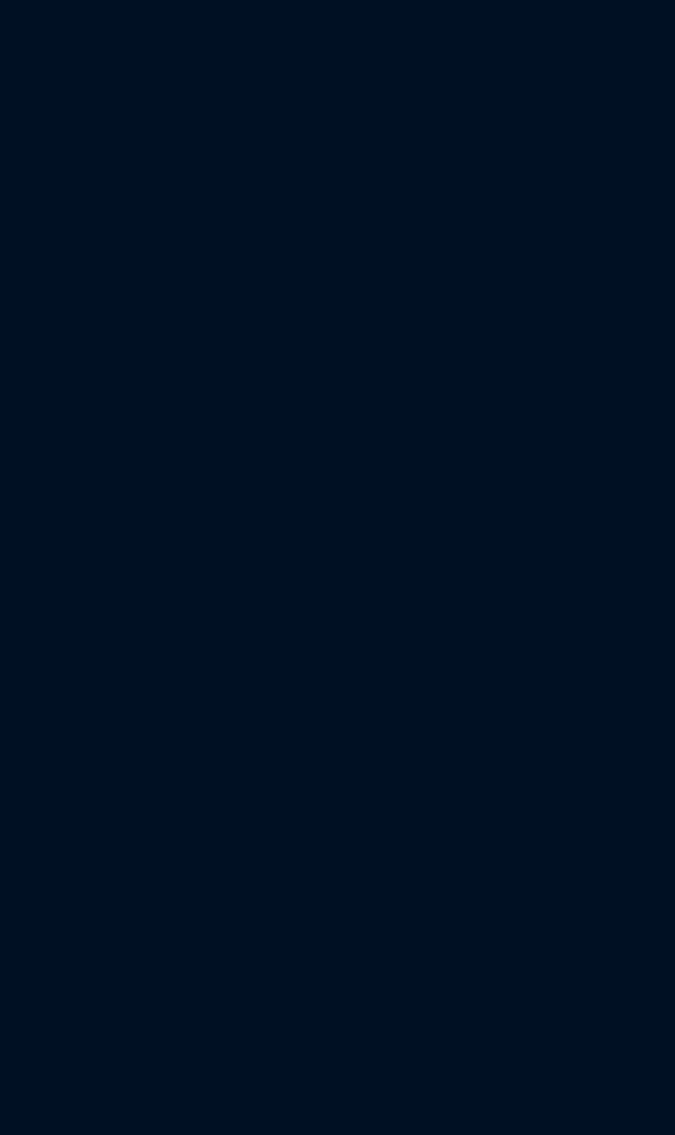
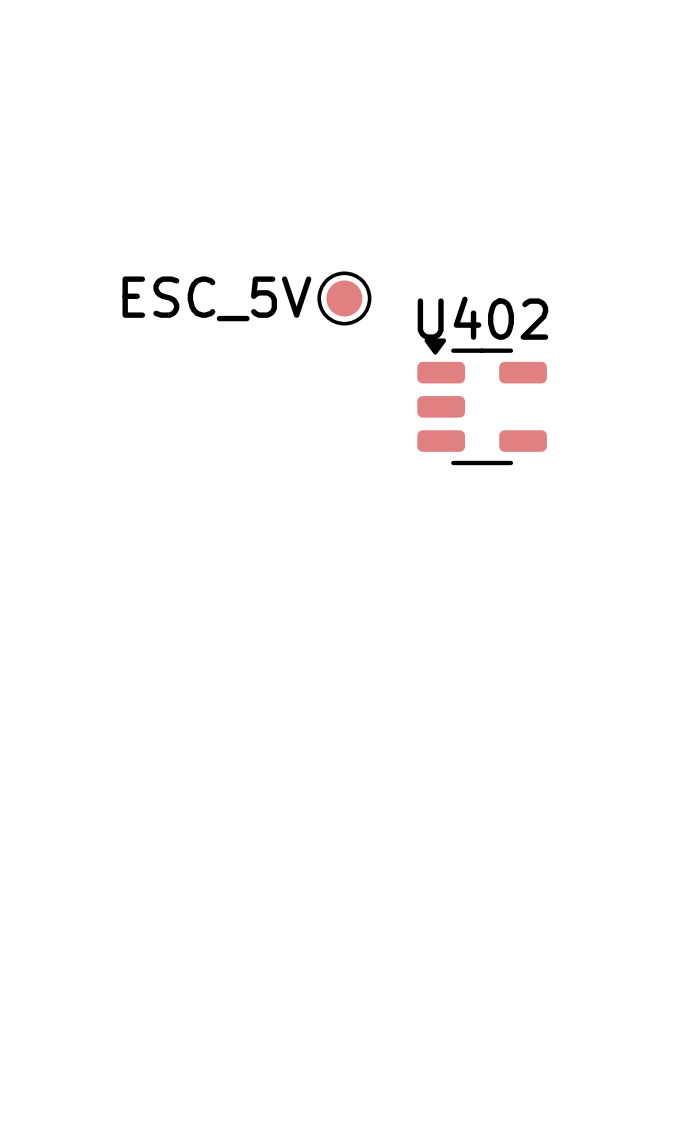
part: none -> ESC_5V (344, 298)
U402: none -> (482, 401)

